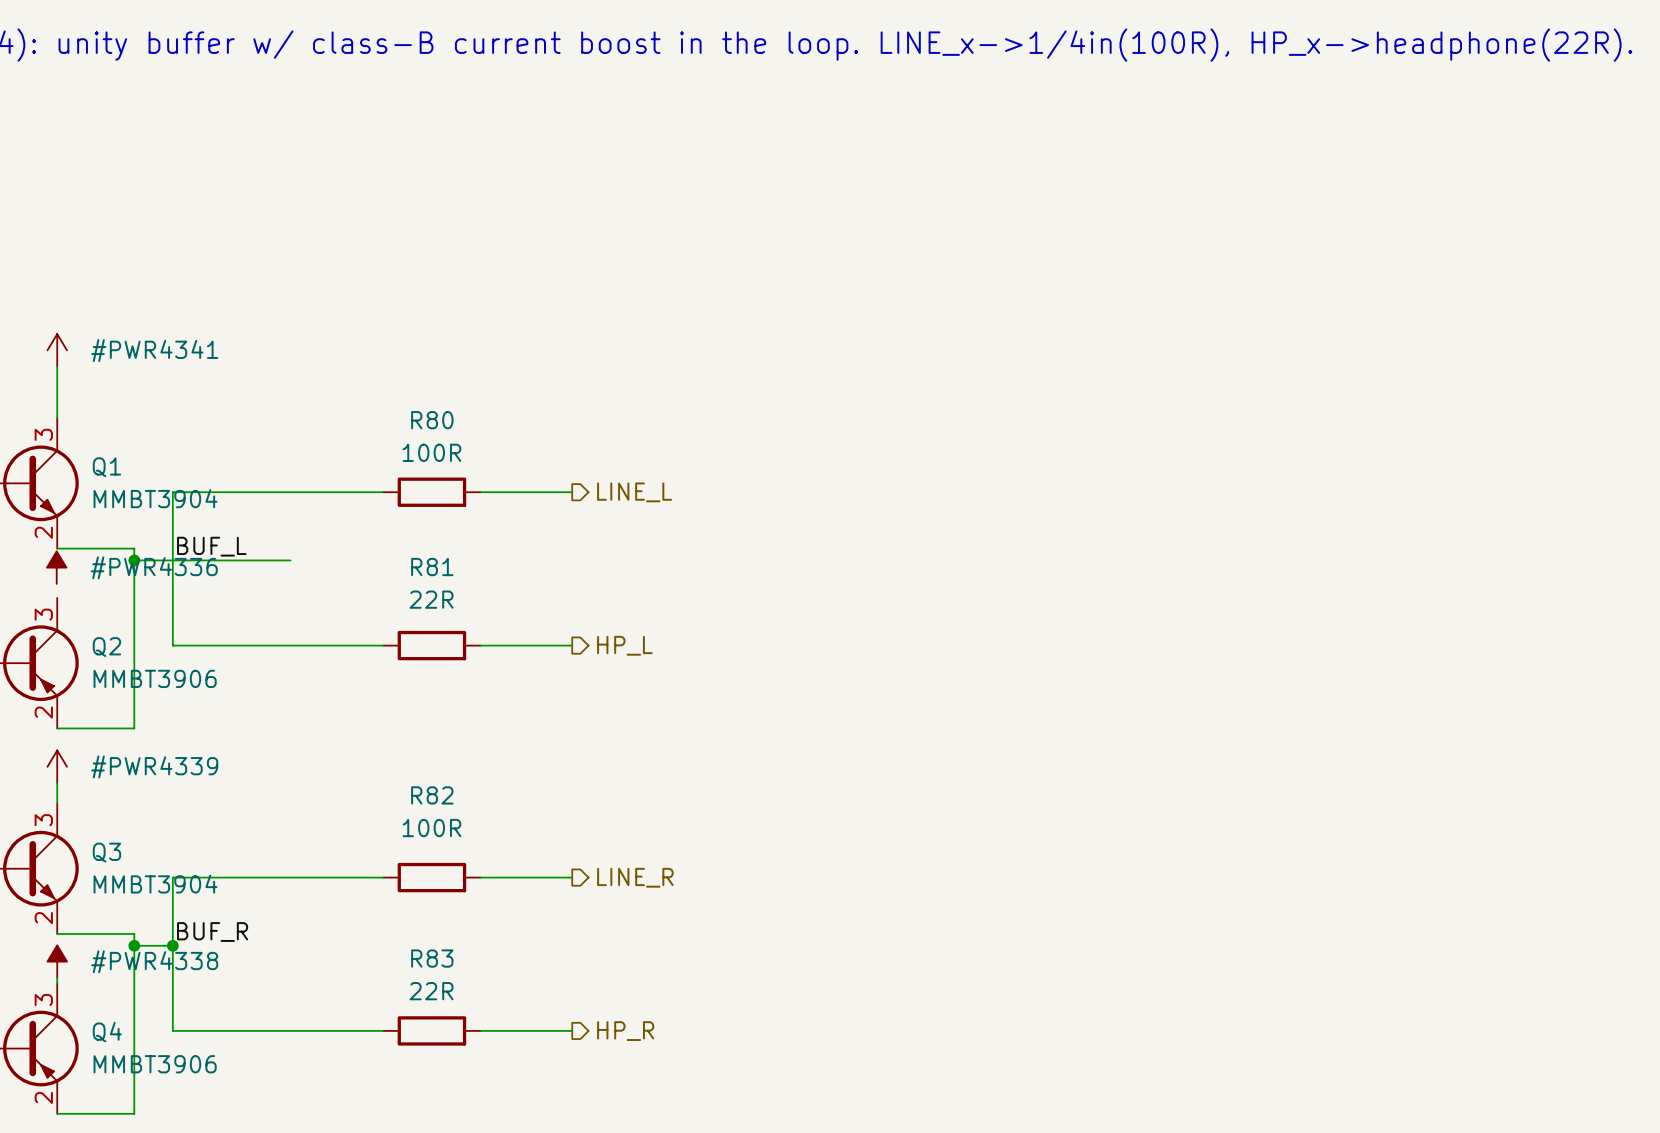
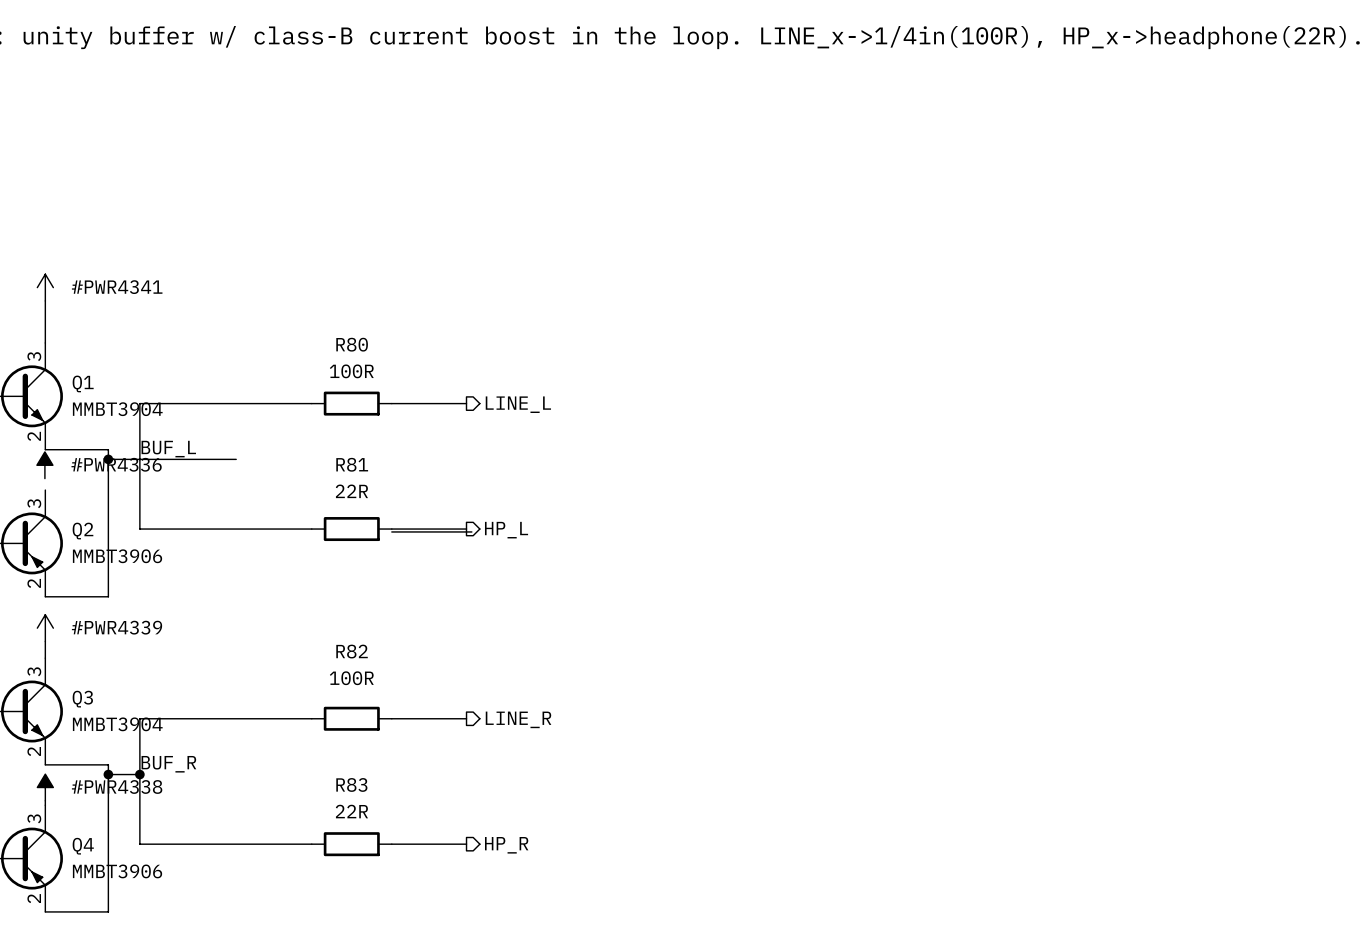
wire: none -> (391, 531) (471, 531)

